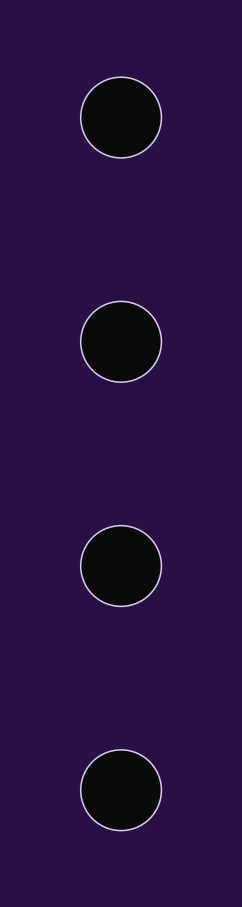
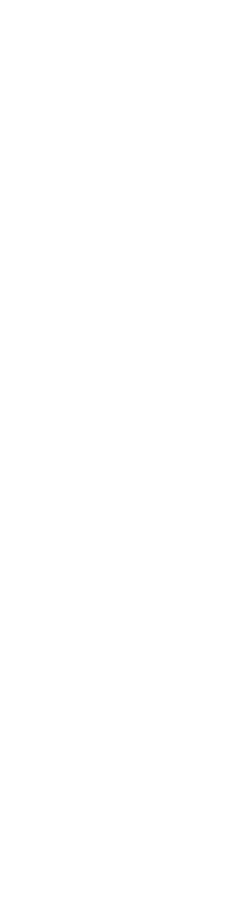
part: (121, 117) -> none
part: (121, 341) -> none
part: (121, 566) -> none
part: (121, 790) -> none

